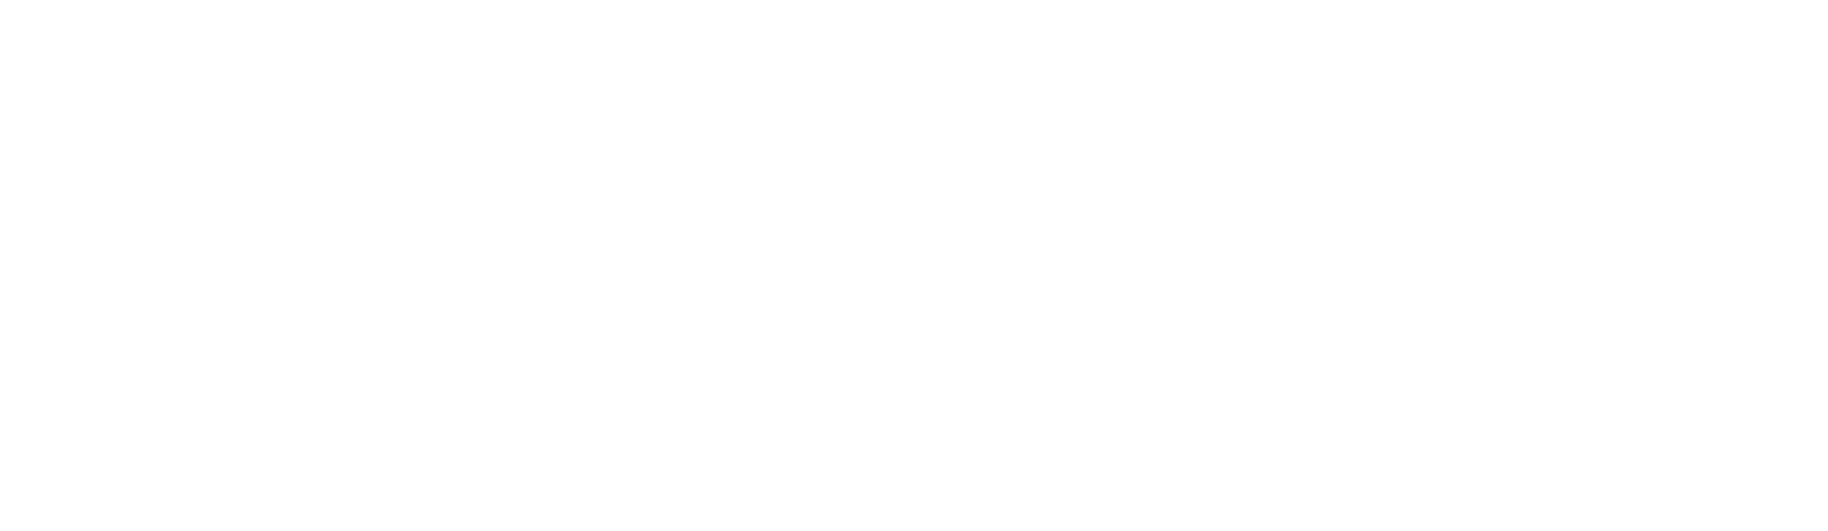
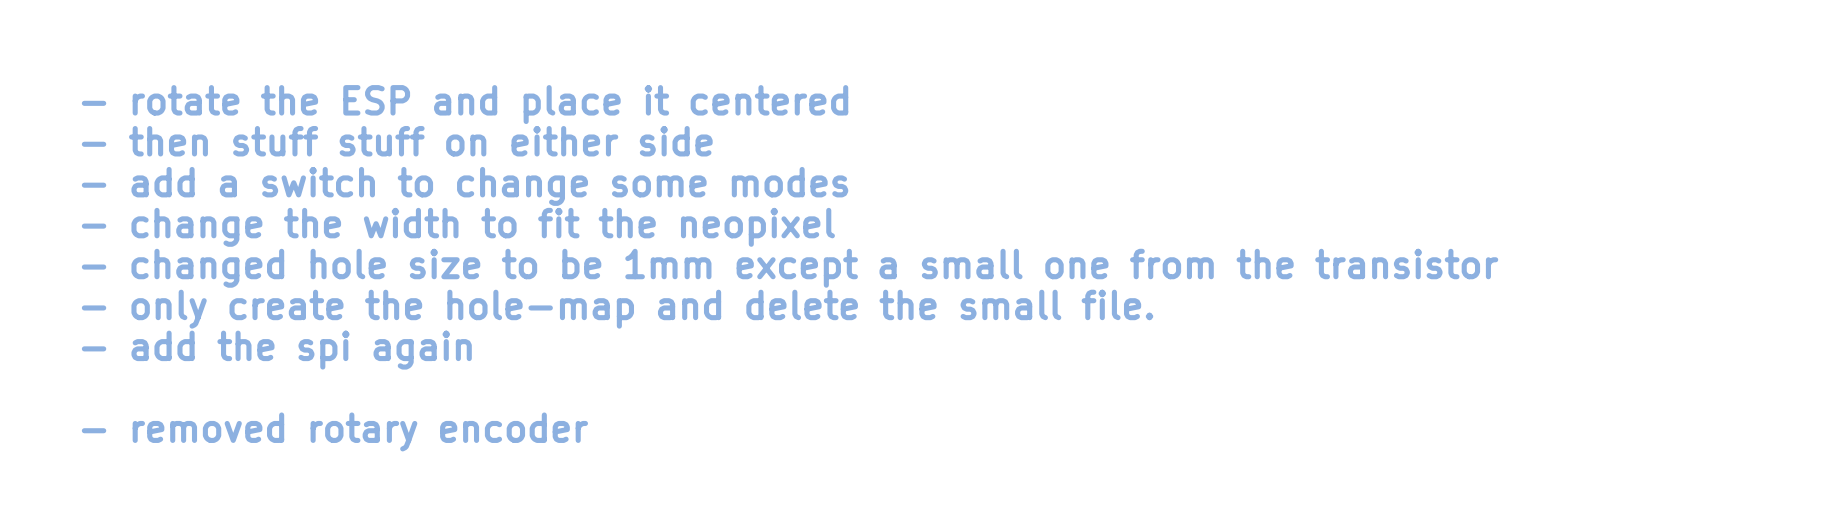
text: none -> - rotate the ESP and place it centered (465, 104)
text: none -> - then stuff stuff on either side (397, 141)
text: none -> - add a switch to change some modes (465, 186)
text: none -> - change the width to fit the neopixel (458, 227)
text: none -> - changed hole size to be 1mm except a small one from the transistor (790, 268)
text: none -> - only create the hole-map and delete the small file. (617, 309)
text: none -> - add the spi again (276, 350)
text: none -> - removed rotary encoder (334, 431)

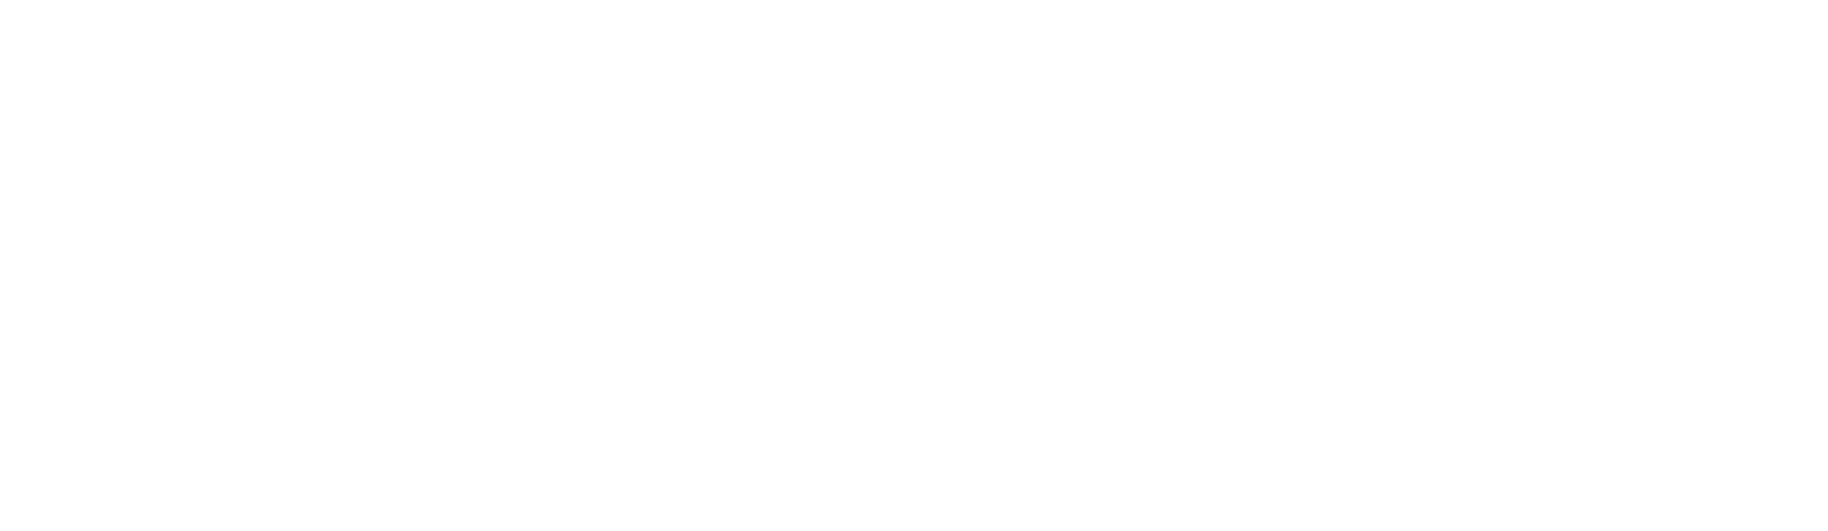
text: - rotate the ESP and place it centered (465, 104) -> none
text: - then stuff stuff on either side (397, 141) -> none
text: - add a switch to change some modes (465, 186) -> none
text: - change the width to fit the neopixel (458, 227) -> none
text: - changed hole size to be 1mm except a small one from the transistor (790, 268) -> none
text: - only create the hole-map and delete the small file. (617, 309) -> none
text: - add the spi again (276, 350) -> none
text: - removed rotary encoder (334, 431) -> none

